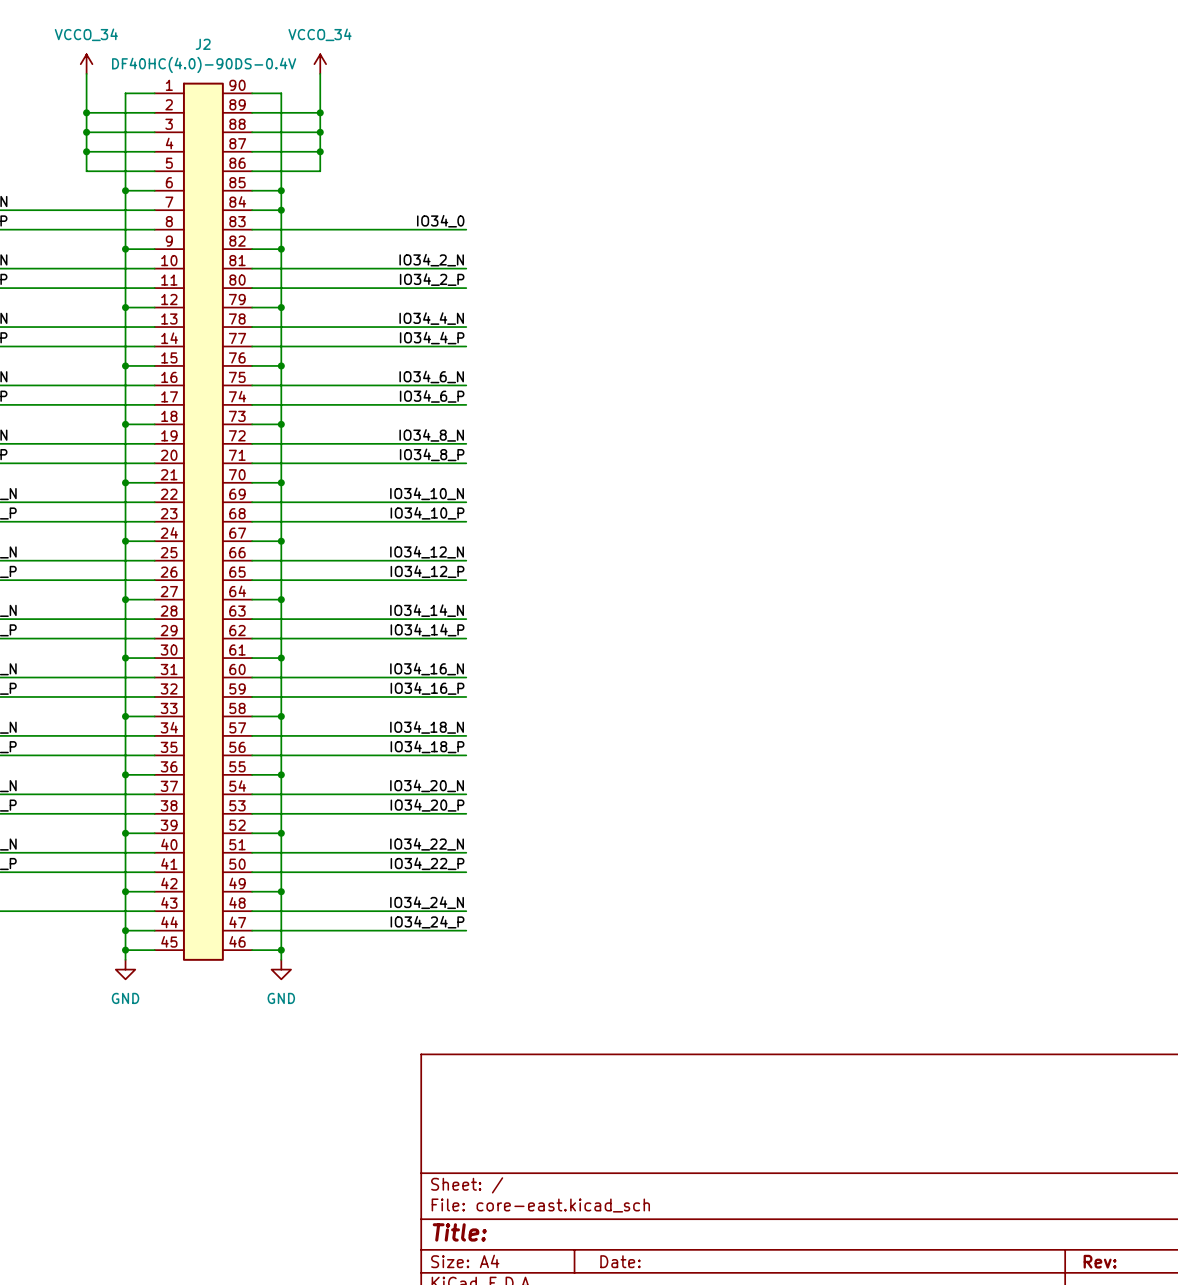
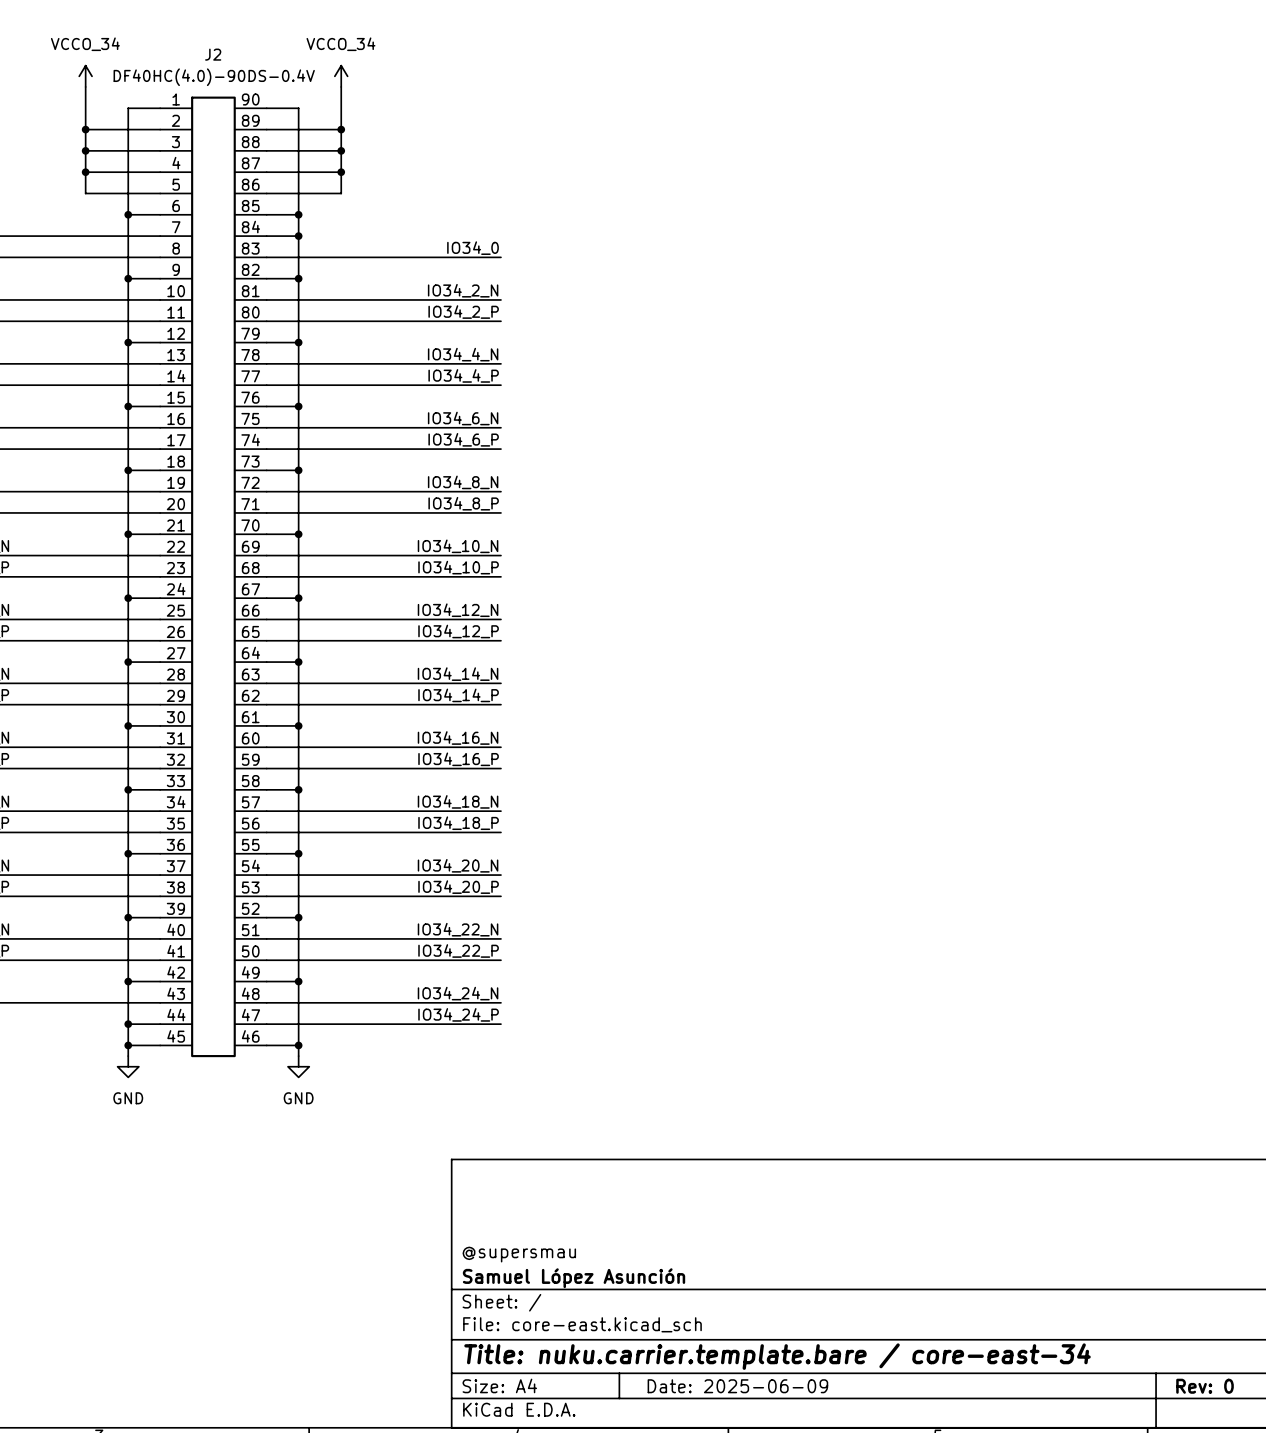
title block: none -> @supersmau (519, 1254)
title block: none -> Samuel López Asunción (574, 1278)
title block: Title: (459, 1232) -> Title: nuku.carrier.template.bare / core-east-34 (777, 1356)
title block: Date: (620, 1261) -> Date: 2025-06-09 (737, 1386)
title block: Rev: (1100, 1261) -> Rev: 0 (1205, 1386)

